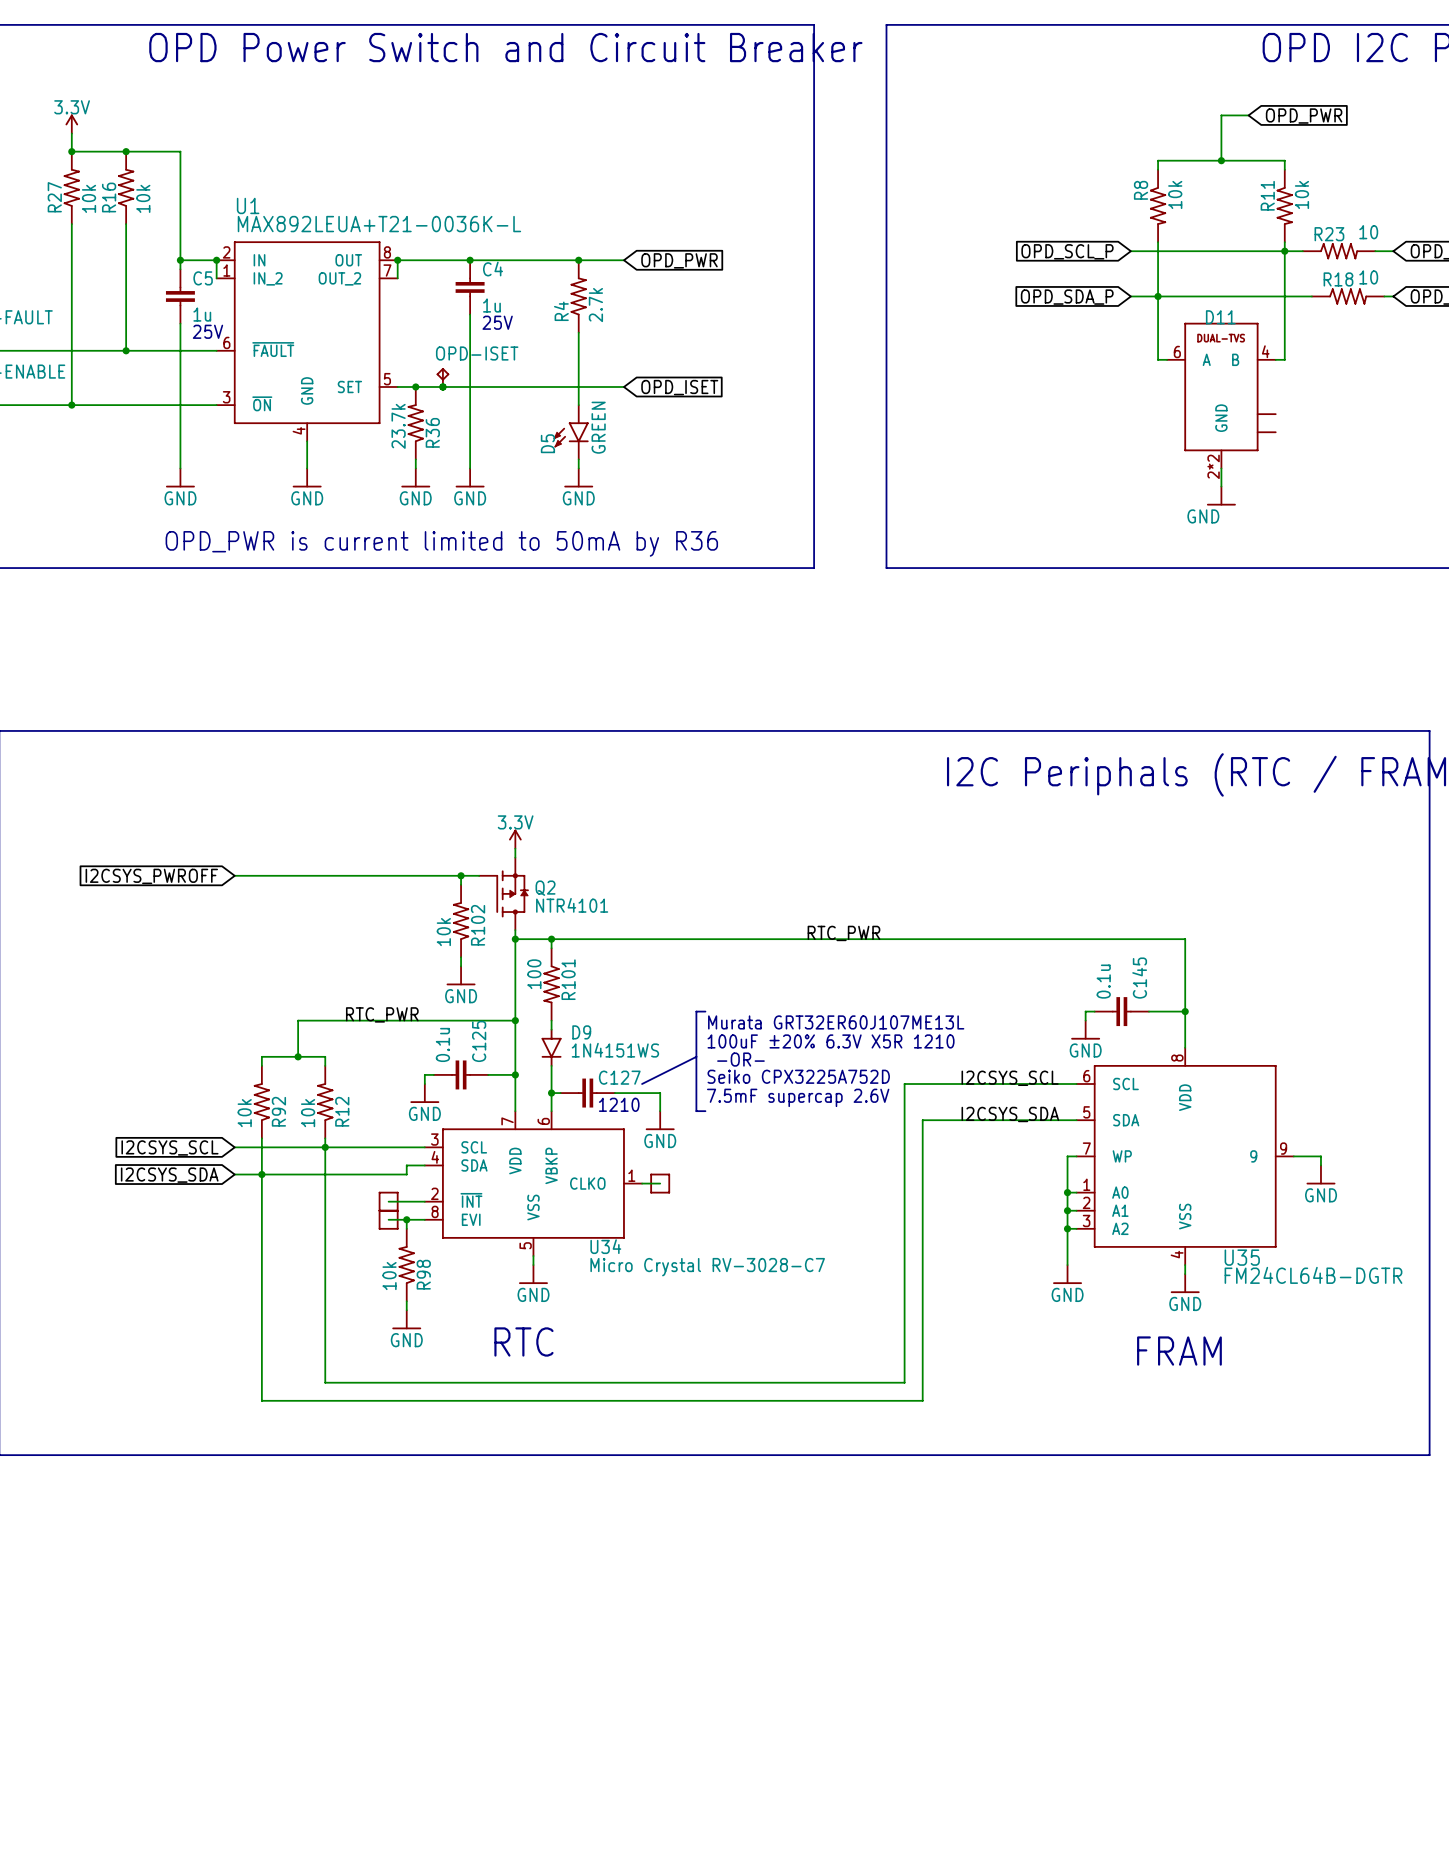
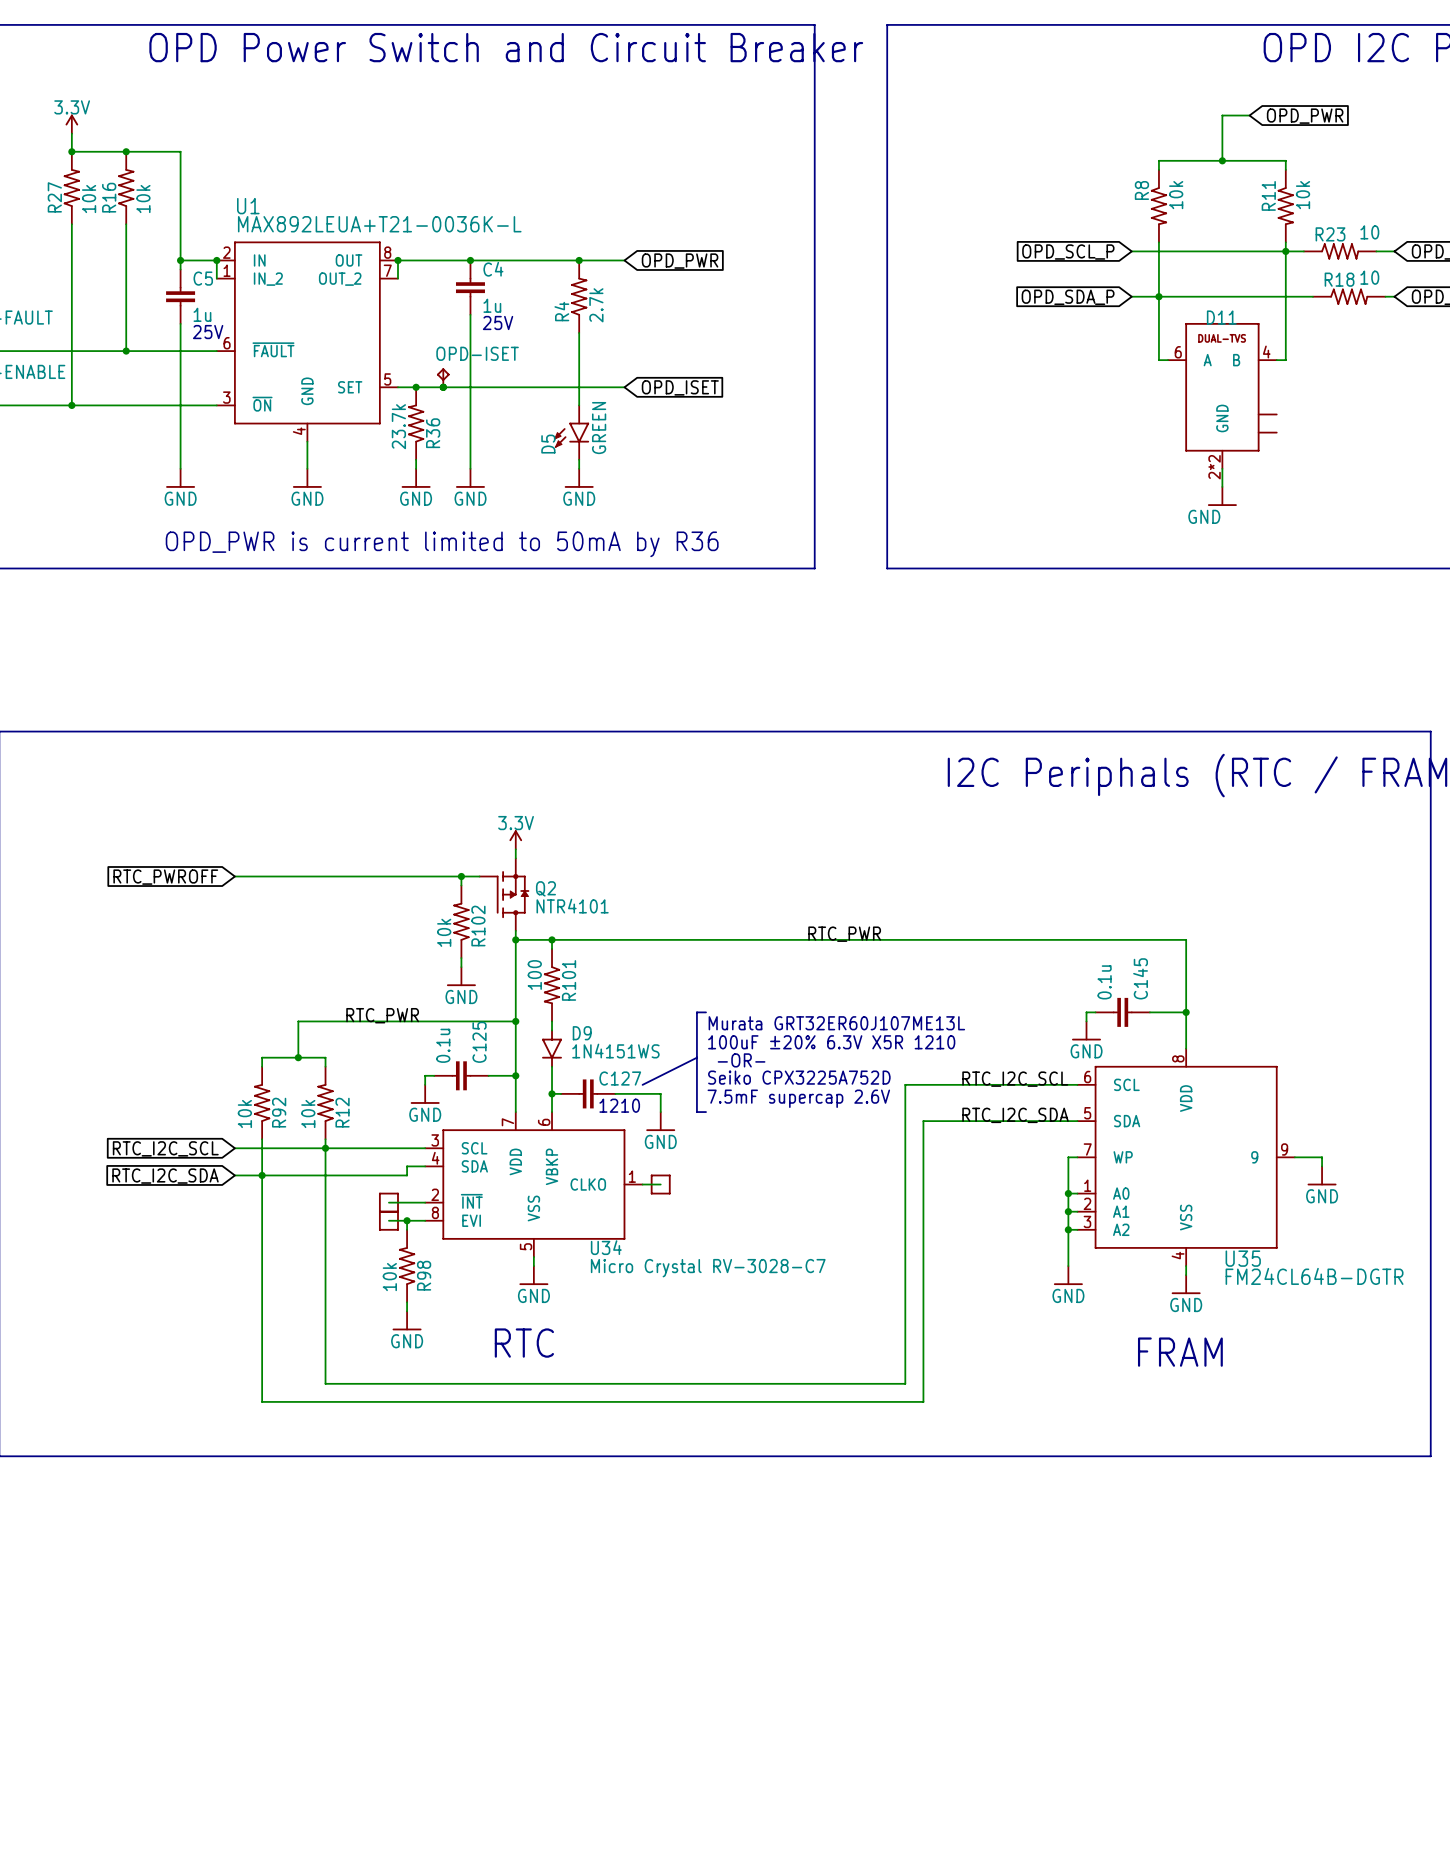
global label: I2CSYS_PWROFF (151, 876) -> RTC_PWROFF (165, 877)
label: I2CSYS_SCL (1010, 1078) -> RTC_I2C_SCL (1015, 1079)
label: I2CSYS_SDA (1010, 1114) -> RTC_I2C_SDA (1015, 1115)
global label: I2CSYS_SCL (169, 1147) -> RTC_I2C_SCL (165, 1148)
global label: I2CSYS_SDA (169, 1175) -> RTC_I2C_SDA (165, 1176)

